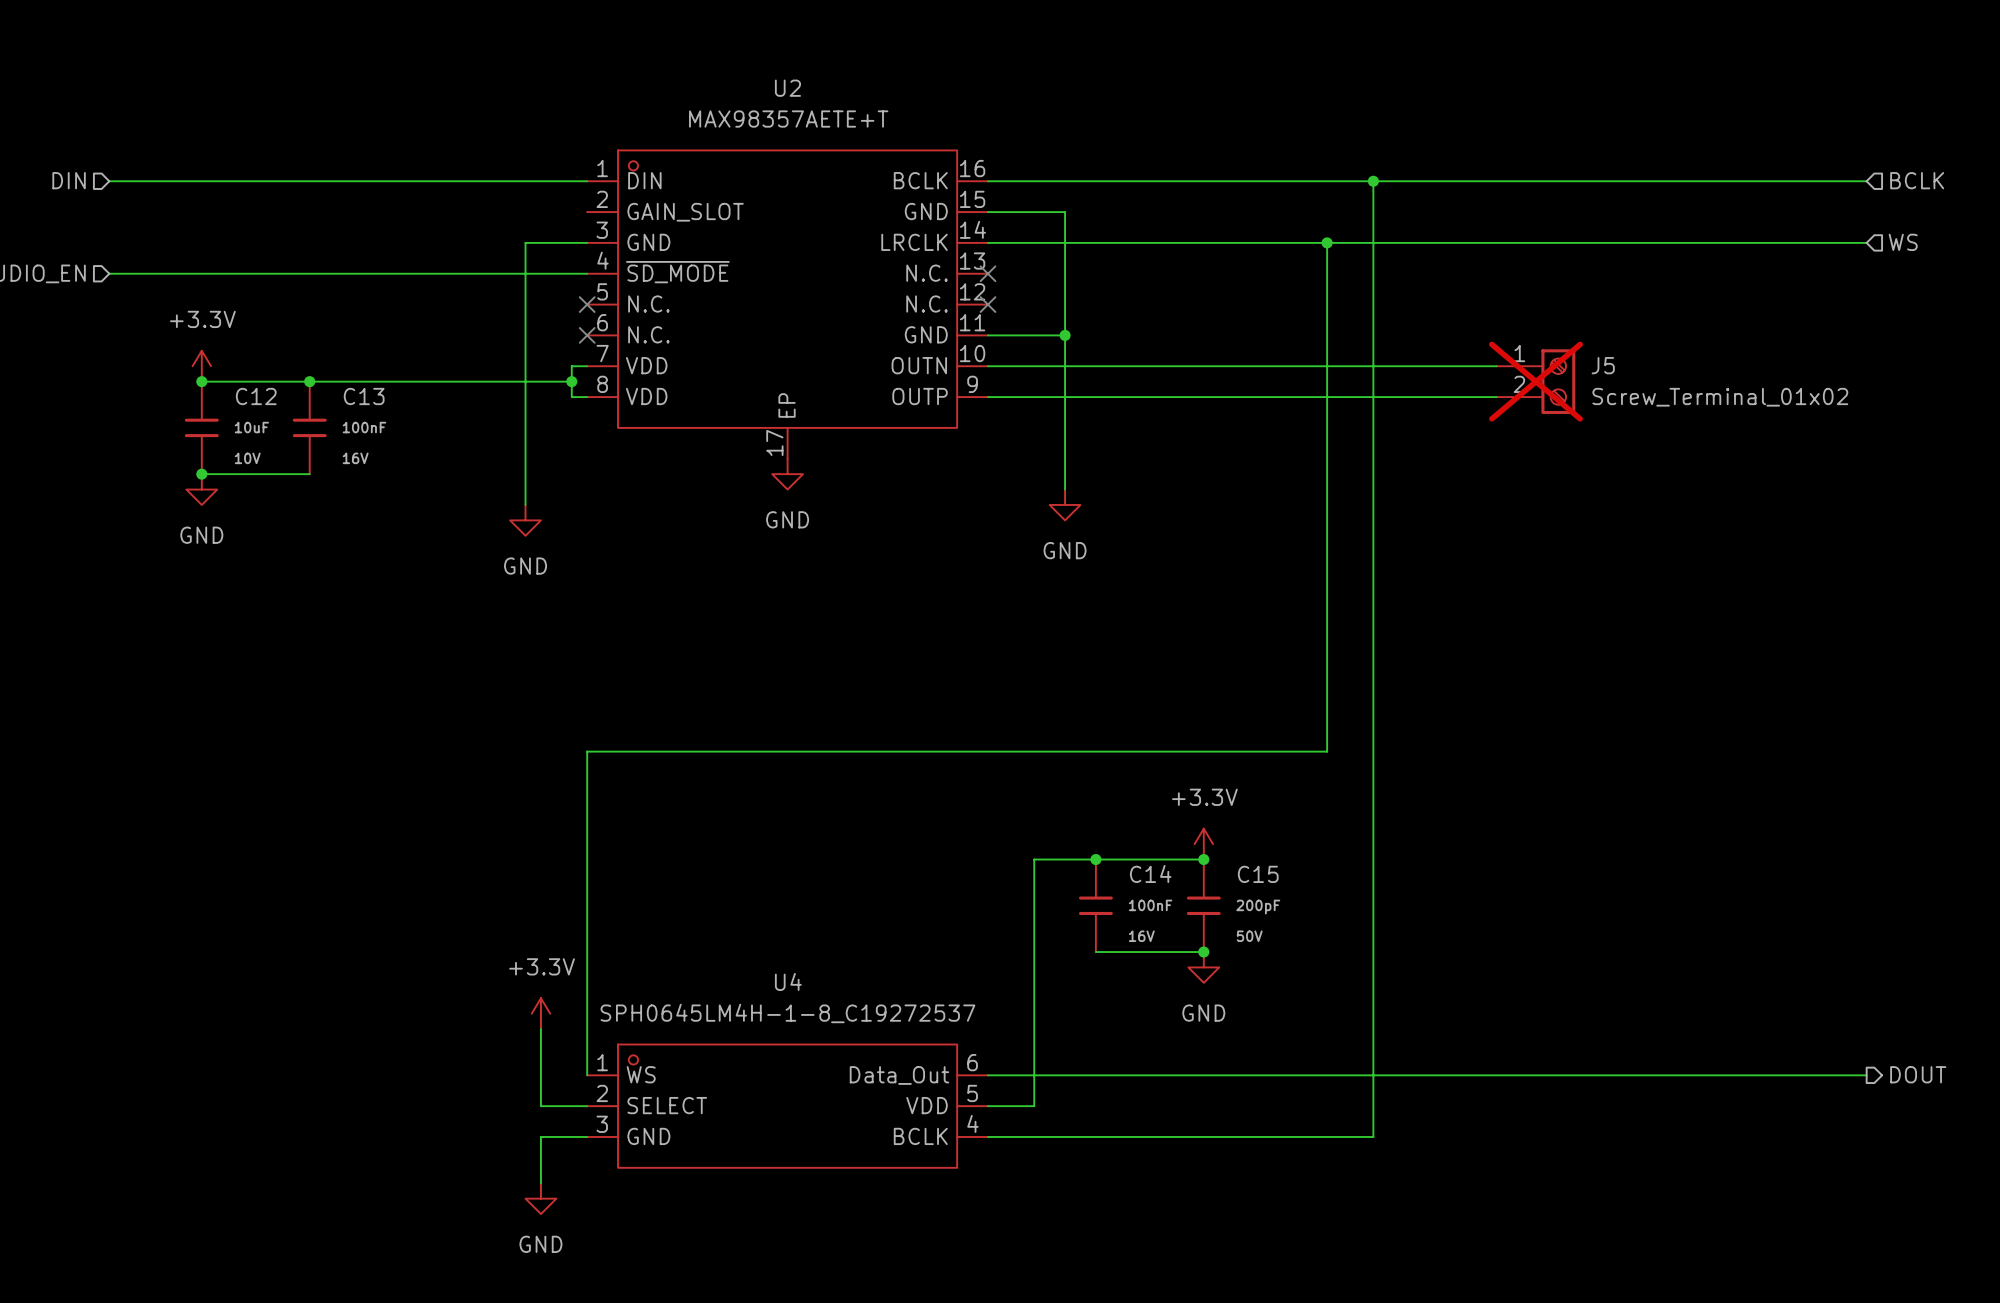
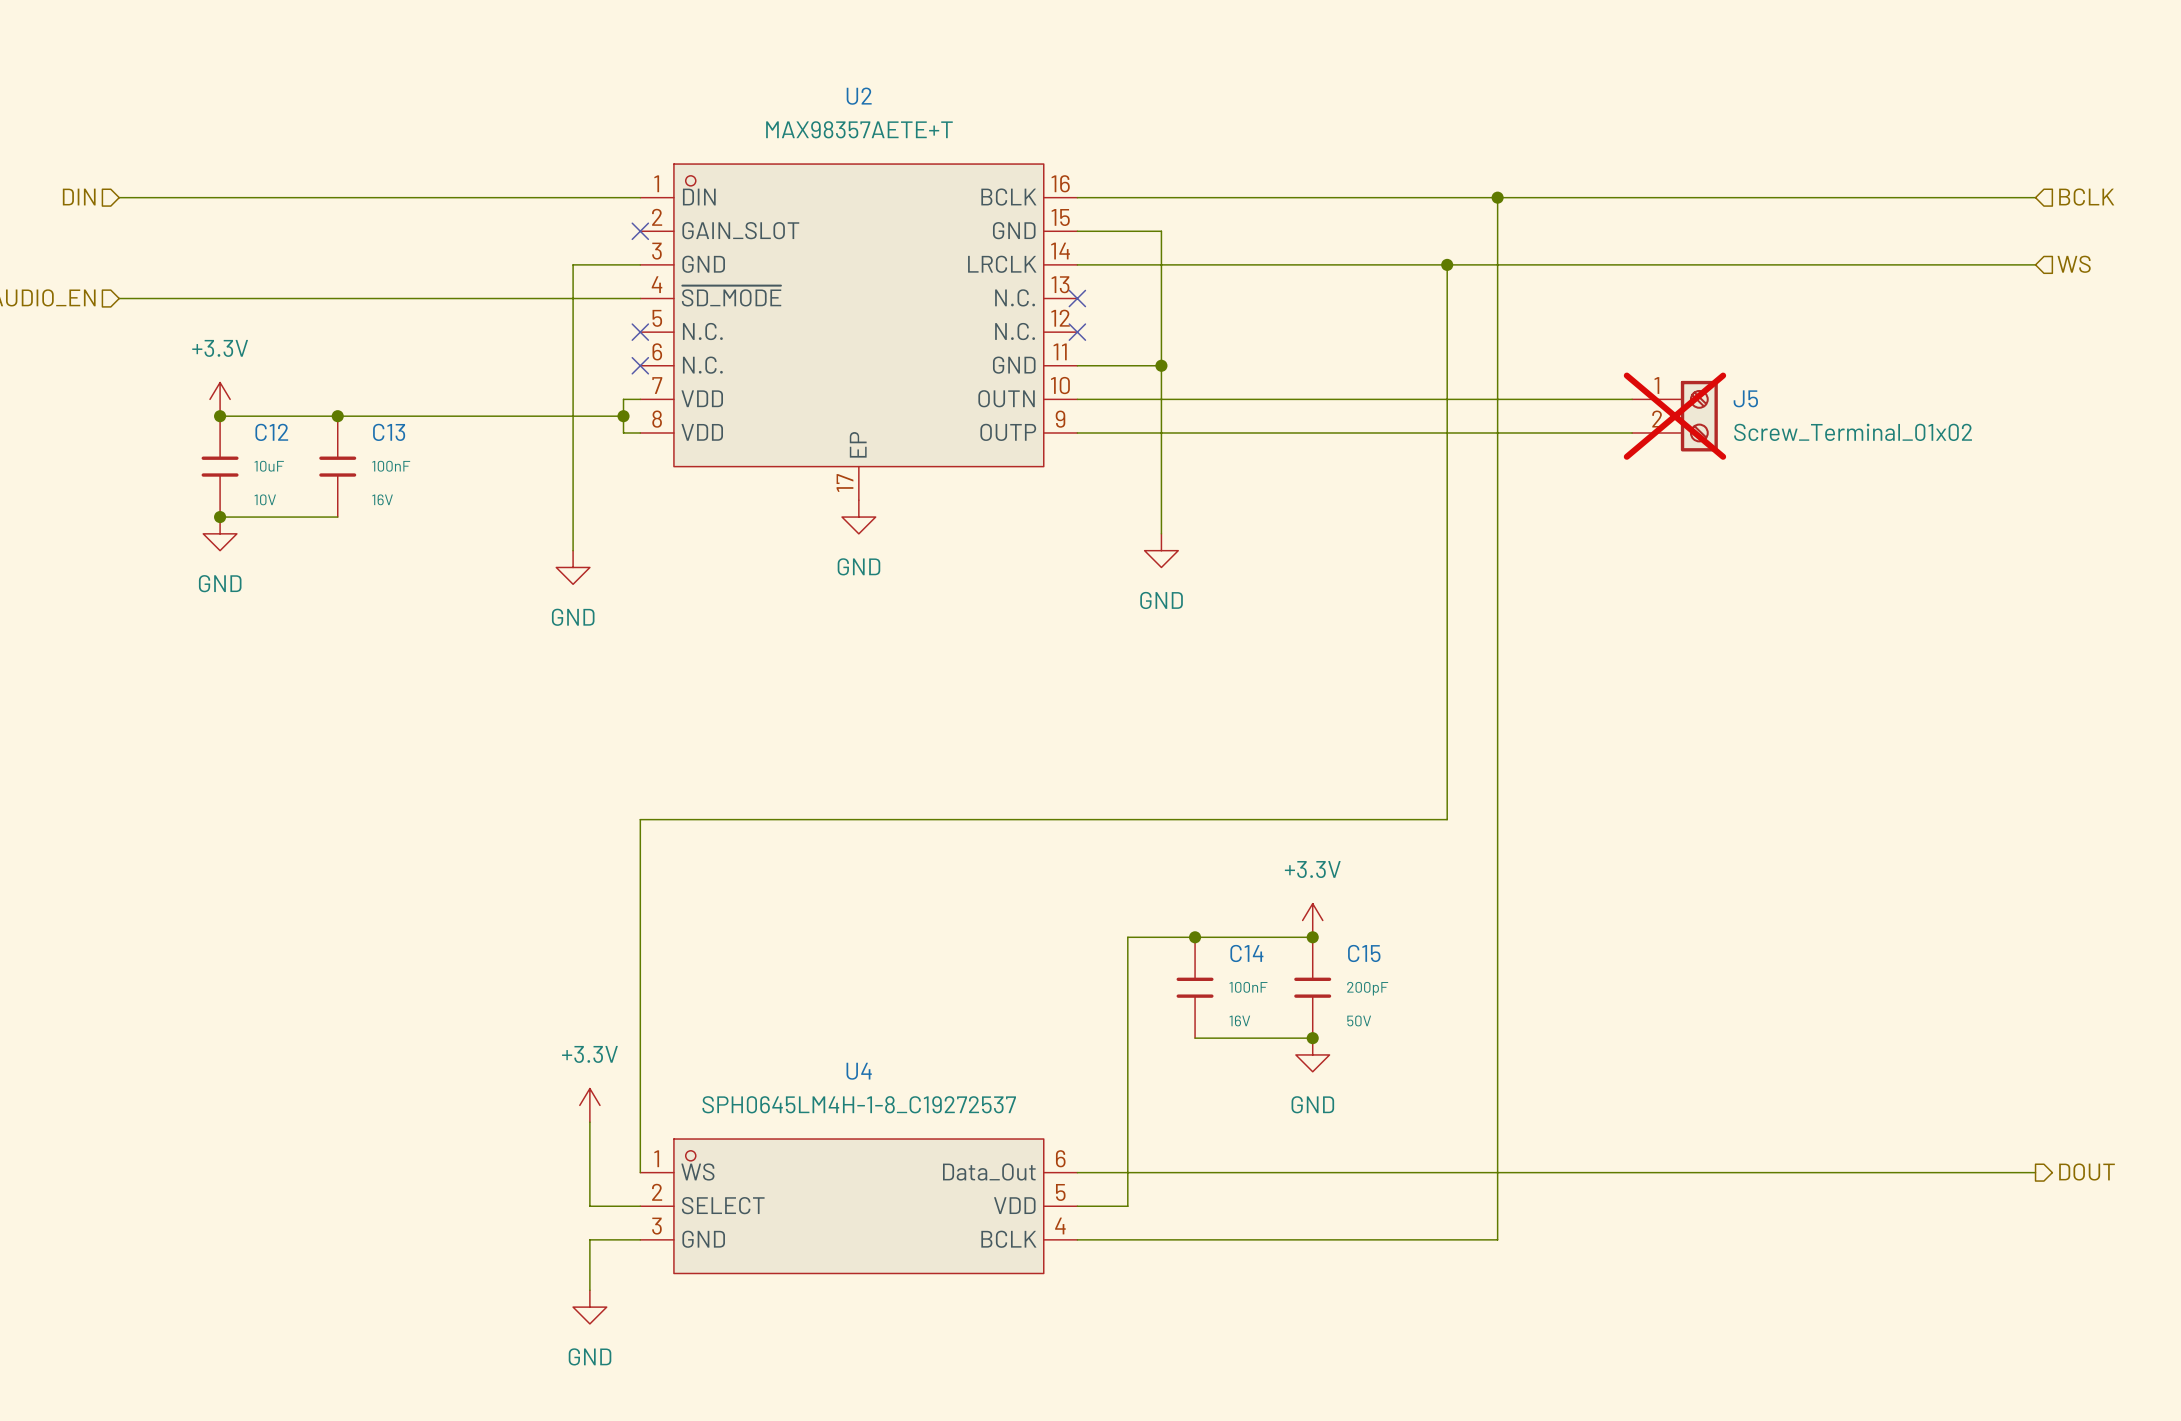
no-connect mark: none -> (640, 231)

